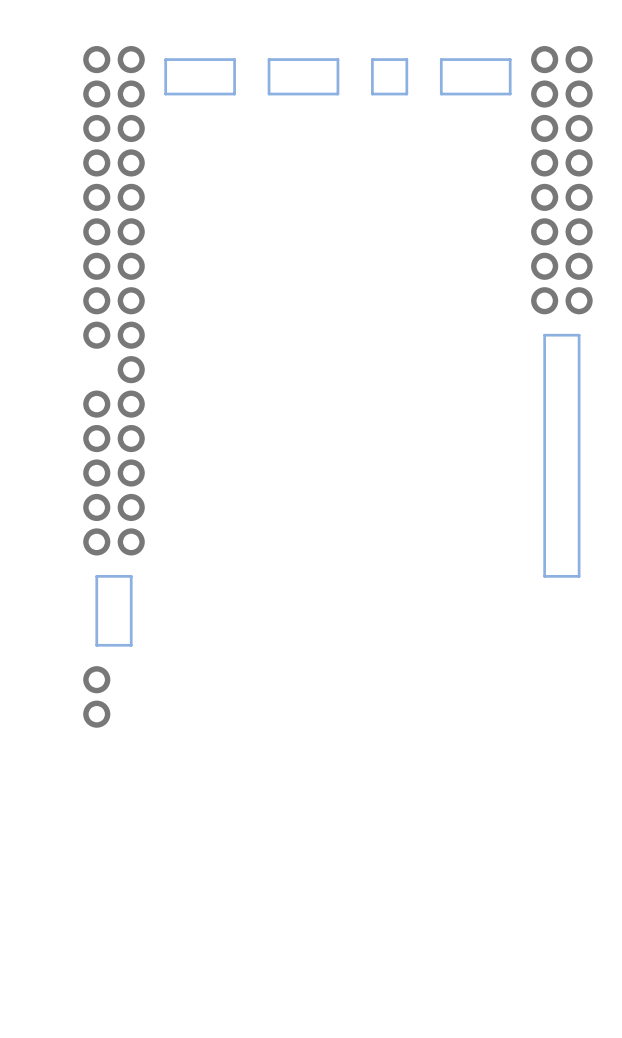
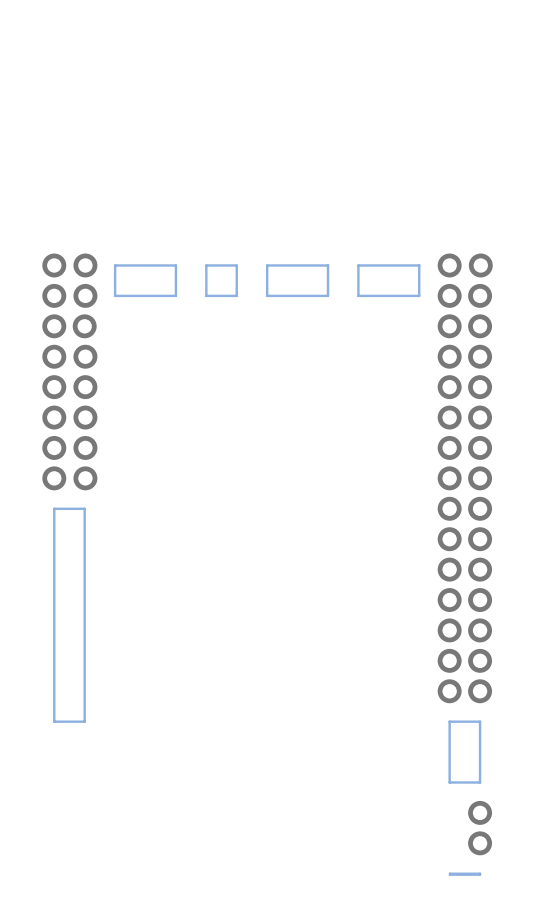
via: (96, 59) -> none
via: (131, 59) -> none
track: (234, 59) (165, 59) (165, 94) (234, 94) (234, 59) -> none
track: (337, 59) (269, 59) (269, 94) (337, 94) (337, 59) -> (175, 265) (115, 265) (115, 295) (175, 295) (175, 265)
track: (406, 59) (372, 59) (372, 94) (406, 94) (406, 59) -> (236, 265) (206, 265) (206, 295) (236, 295) (236, 265)
track: (510, 59) (441, 59) (441, 94) (510, 94) (510, 59) -> (328, 265) (267, 265) (267, 295) (328, 295) (328, 265)
via: (544, 59) -> none
via: (579, 59) -> none
via: (96, 94) -> none
via: (131, 94) -> none
via: (544, 94) -> none
via: (579, 94) -> none
via: (96, 128) -> none
via: (131, 128) -> none
via: (544, 128) -> none
via: (579, 128) -> none
via: (96, 162) -> none
via: (131, 162) -> none
via: (544, 162) -> none
via: (579, 162) -> none
via: (96, 197) -> none
via: (131, 197) -> none
via: (544, 197) -> none
via: (579, 197) -> none
via: (96, 231) -> none
via: (131, 231) -> none
via: (544, 231) -> none
via: (579, 231) -> none
via: (96, 266) -> none
via: (131, 266) -> none
via: (544, 266) -> none
via: (579, 266) -> none
via: none -> (54, 265)
via: (131, 300) -> none
track: none -> (419, 265) (358, 265) (358, 295) (419, 295) (419, 265)
via: none -> (449, 265)
via: (579, 300) -> none
via: none -> (54, 295)
via: (131, 335) -> none
via: none -> (449, 295)
via: none -> (480, 295)
track: (579, 335) (544, 335) (544, 576) (579, 576) (579, 335) -> none
via: none -> (54, 326)
via: none -> (84, 326)
via: (131, 369) -> none
via: none -> (449, 326)
via: none -> (480, 326)
via: none -> (54, 356)
via: (131, 404) -> none
via: none -> (449, 356)
via: none -> (480, 356)
via: none -> (54, 387)
via: (131, 438) -> none
via: none -> (449, 387)
via: none -> (480, 387)
via: none -> (54, 417)
via: (131, 473) -> none
via: none -> (449, 417)
via: none -> (480, 417)
via: none -> (54, 447)
via: (131, 507) -> none
via: none -> (449, 447)
via: none -> (480, 447)
via: none -> (54, 478)
via: (131, 541) -> none
via: none -> (449, 478)
via: none -> (480, 478)
track: none -> (84, 508) (54, 508) (54, 721) (84, 721) (84, 508)
track: (131, 576) (96, 576) (96, 645) (131, 645) (131, 576) -> none
via: none -> (449, 508)
via: none -> (480, 508)
via: none -> (449, 539)
via: none -> (480, 539)
via: none -> (449, 569)
via: none -> (480, 569)
via: (96, 679) -> none
via: none -> (449, 600)
via: none -> (480, 600)
via: (96, 714) -> none
via: none -> (449, 630)
via: none -> (480, 630)
via: none -> (449, 660)
via: none -> (480, 660)
via: none -> (449, 691)
via: none -> (480, 691)
track: none -> (480, 721) (449, 721) (449, 782) (480, 782) (480, 721)
via: none -> (480, 812)
via: none -> (480, 843)
track: none -> (480, 873) (480, 874) (450, 874) (450, 873) (480, 873)

